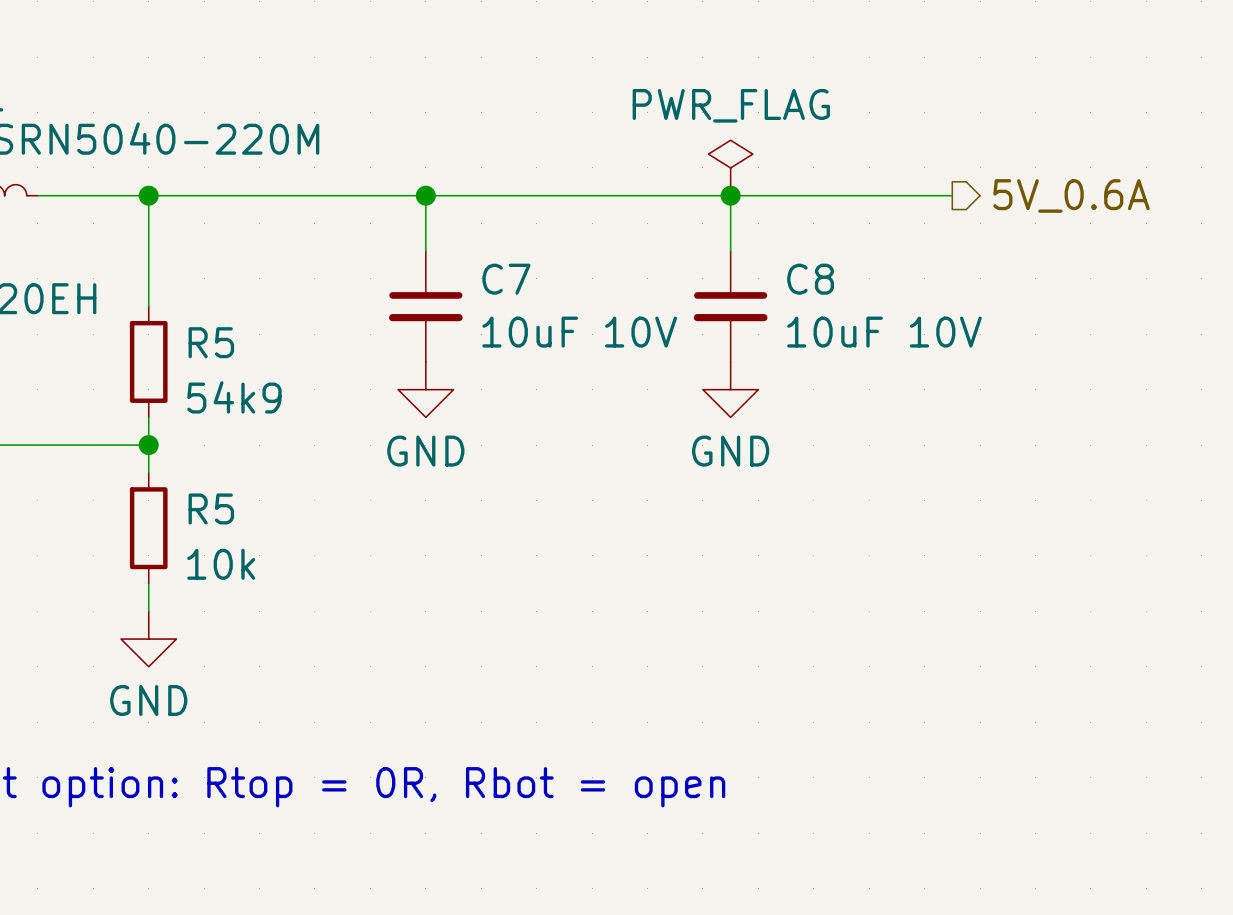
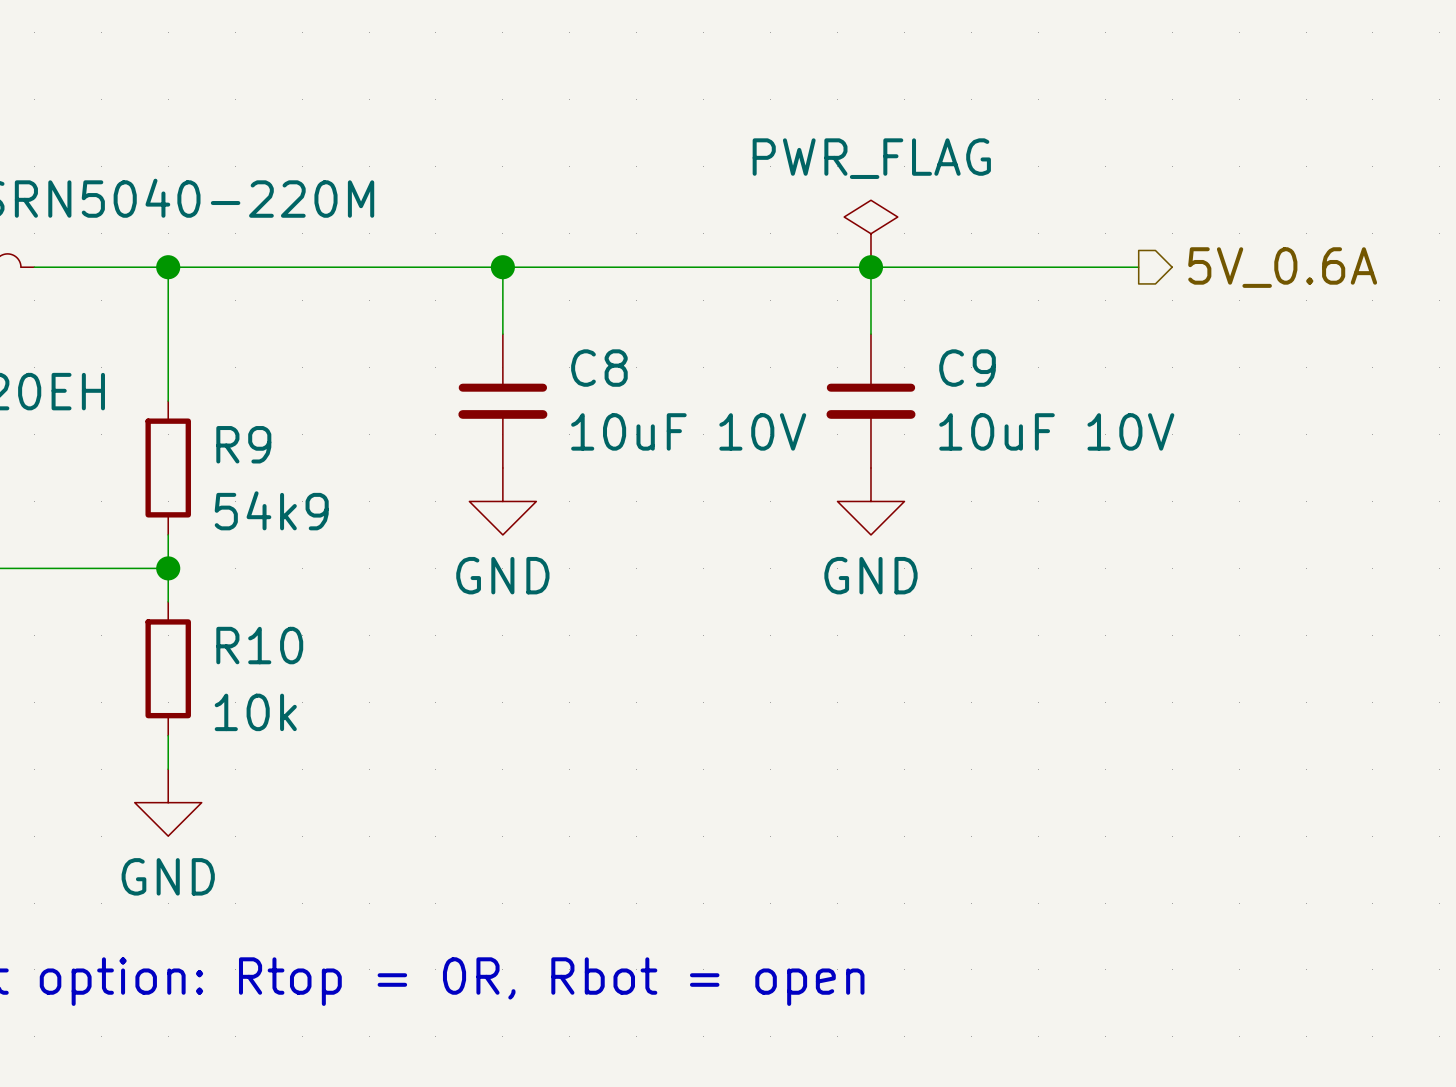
C7 name: C7 (506, 279) -> C8 (599, 368)
C8 name: C8 (810, 279) -> C9 (967, 368)
R5 name: R5 (211, 342) -> R9 (243, 444)
R5 name: R5 (211, 508) -> R10 (259, 645)

